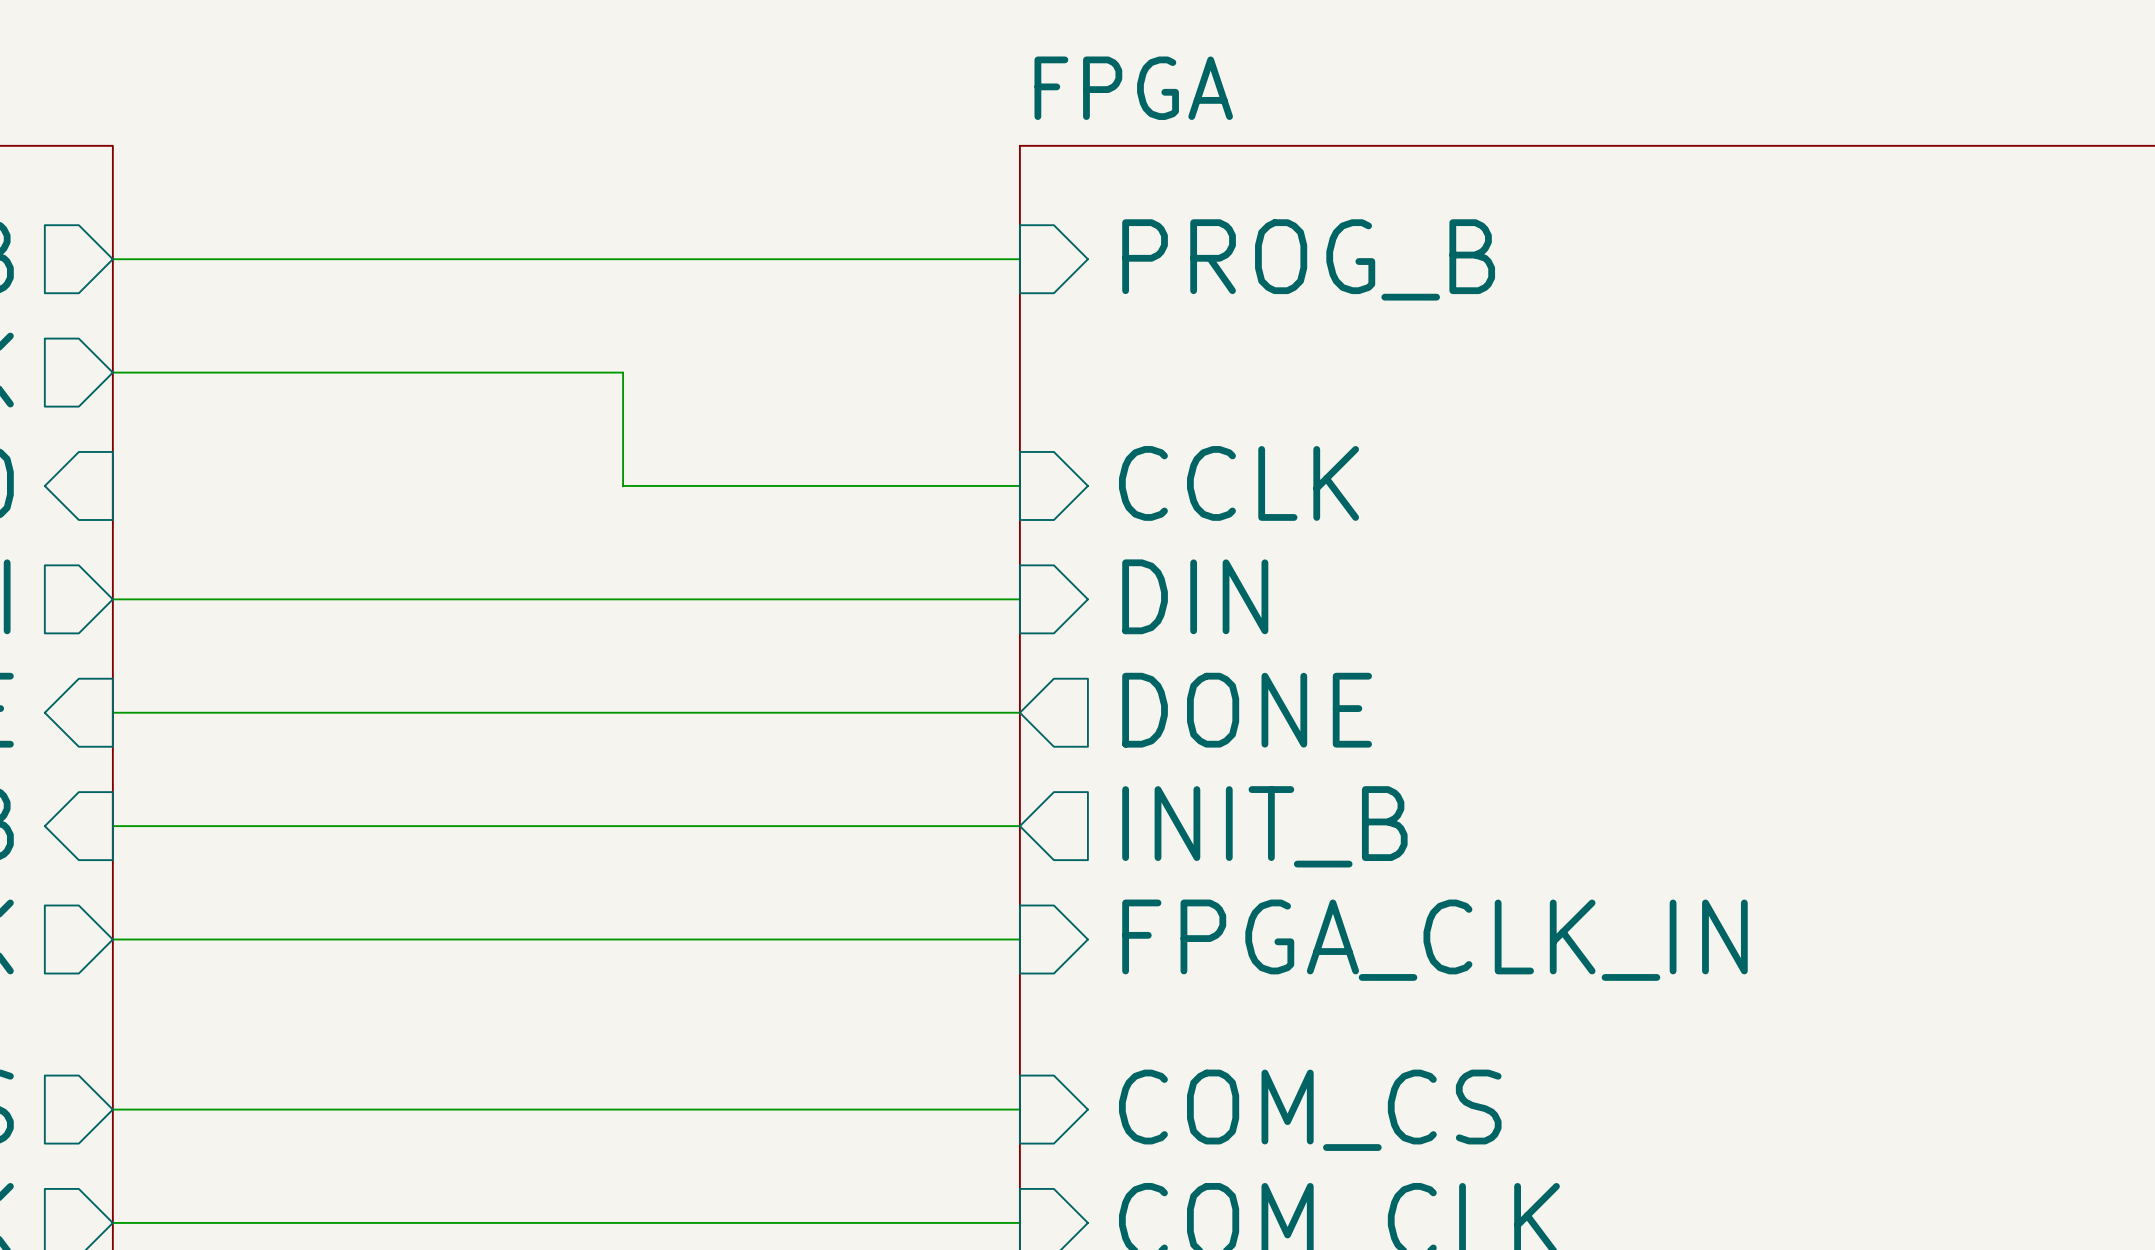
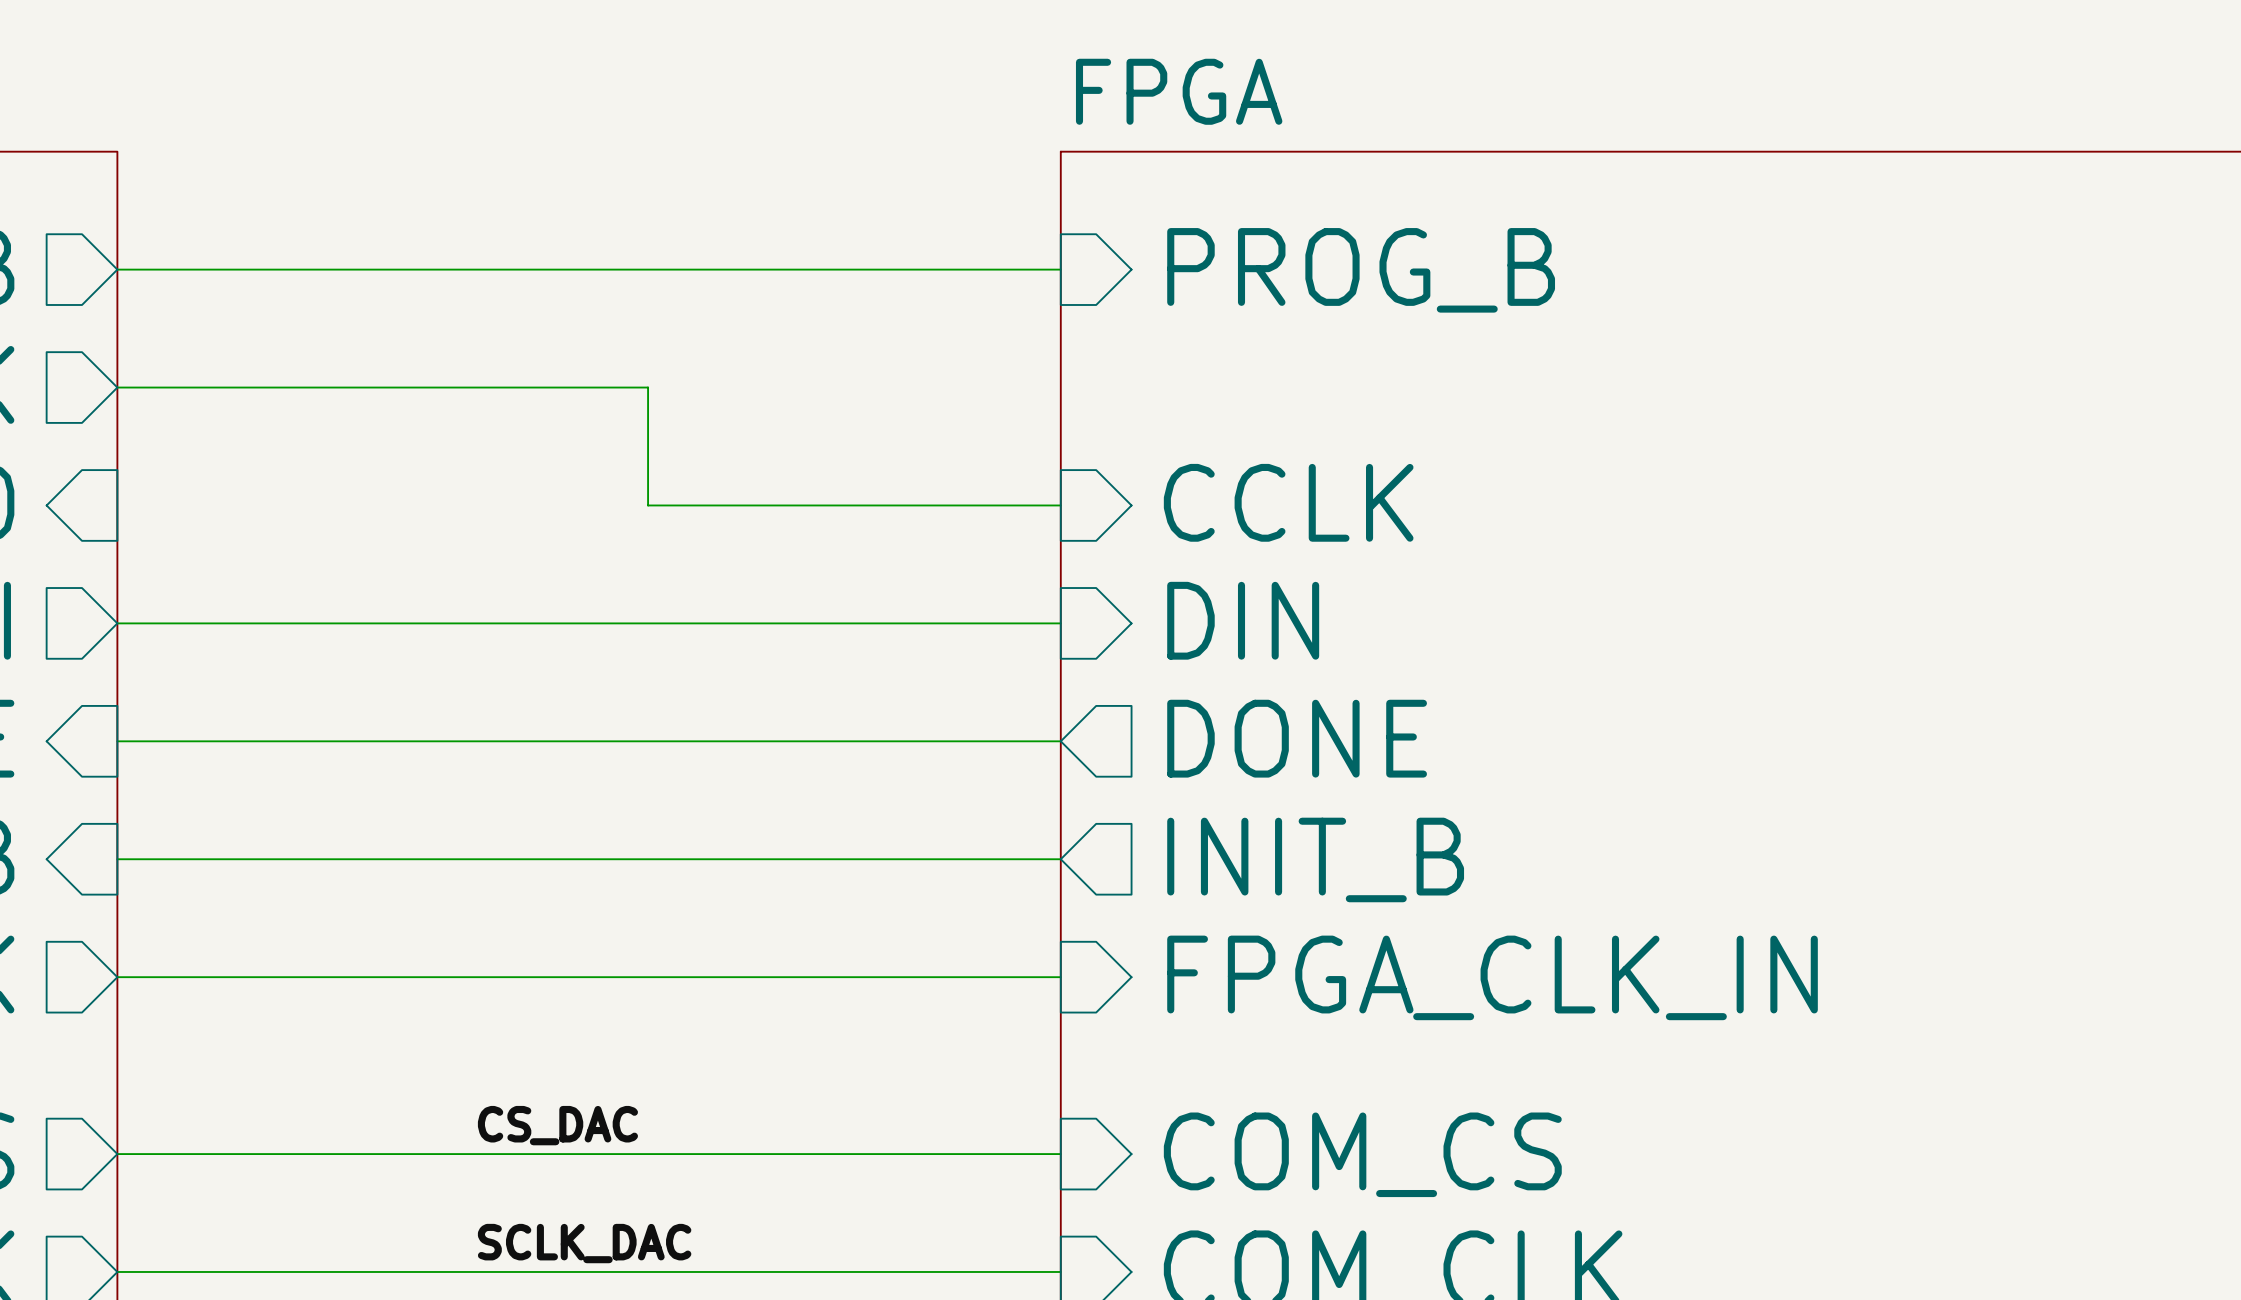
label: none -> CS_DAC (557, 1125)
label: none -> SCLK_DAC (584, 1243)

